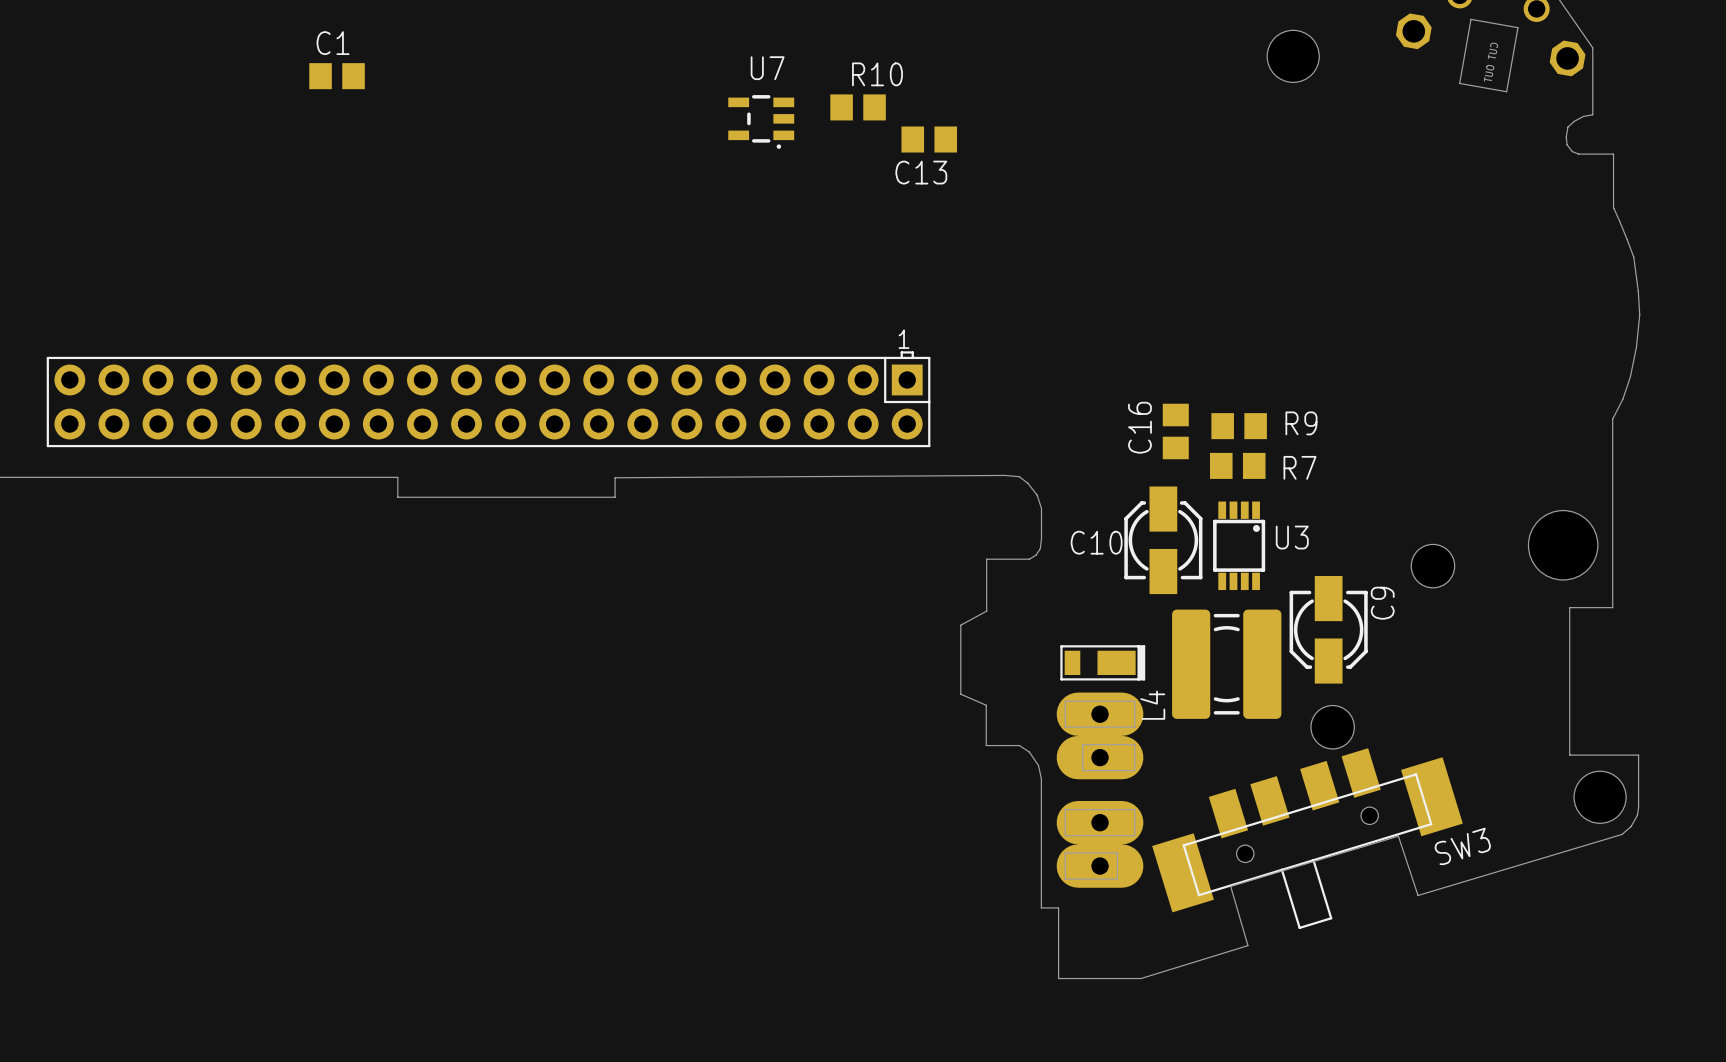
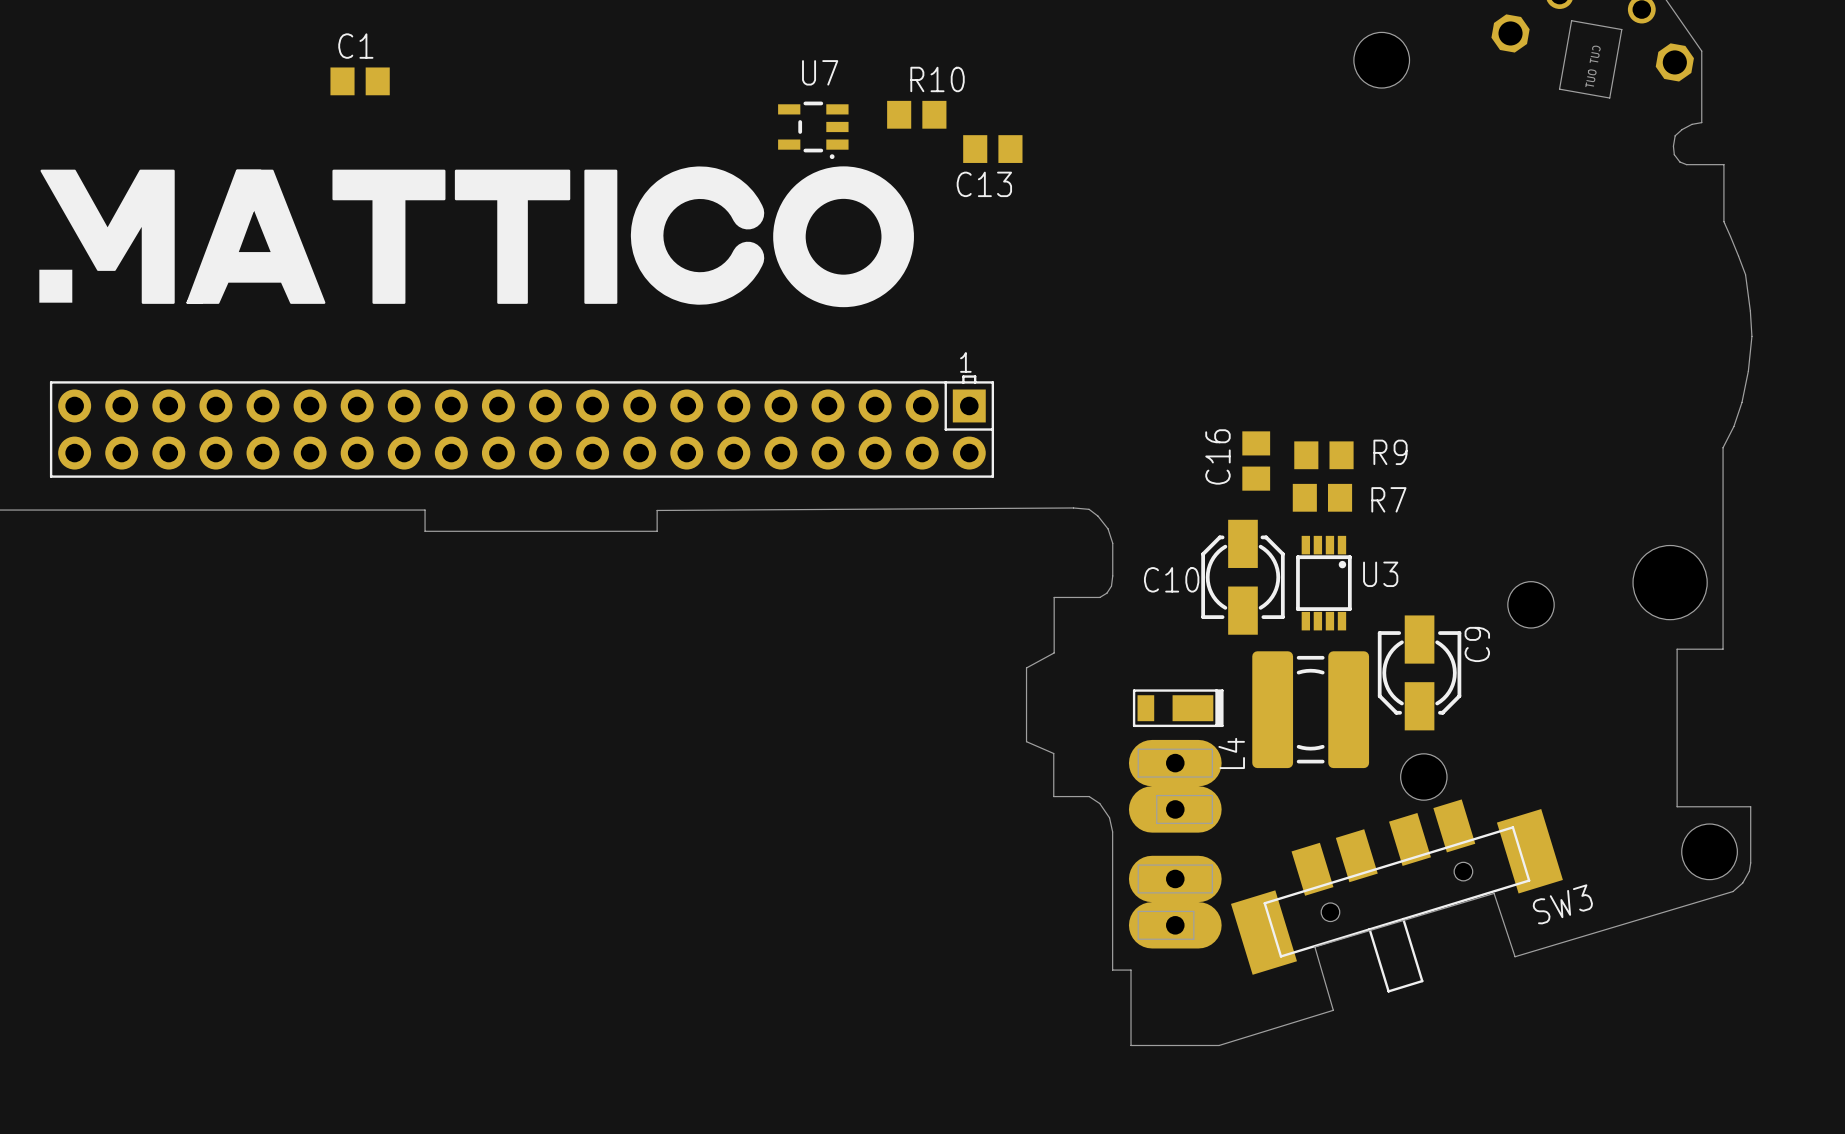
drawing: none -> [39, 166, 914, 308]

